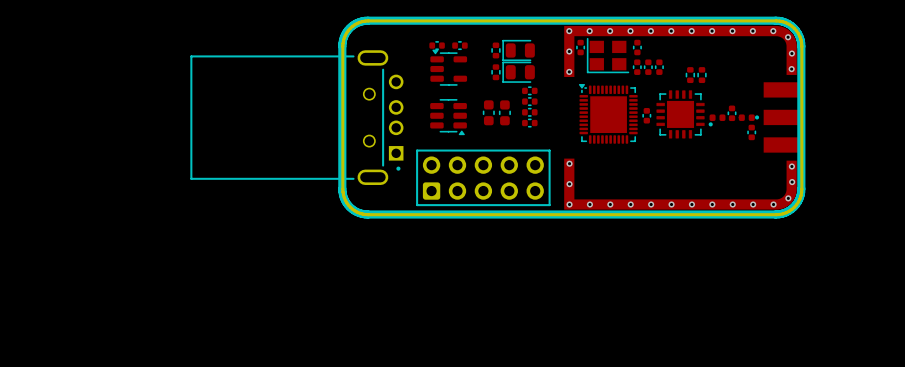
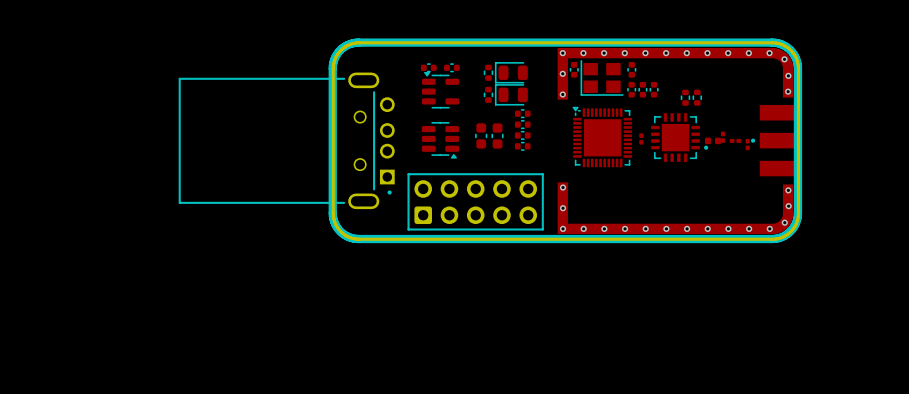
part footprint: [642, 108, 652, 124] -> [639, 133, 644, 145]
part: (732, 113) -> none
part: none -> (723, 137)
part: none -> (735, 140)
part: (746, 117) -> none
part: none -> (747, 144)
part: (751, 132) -> none

